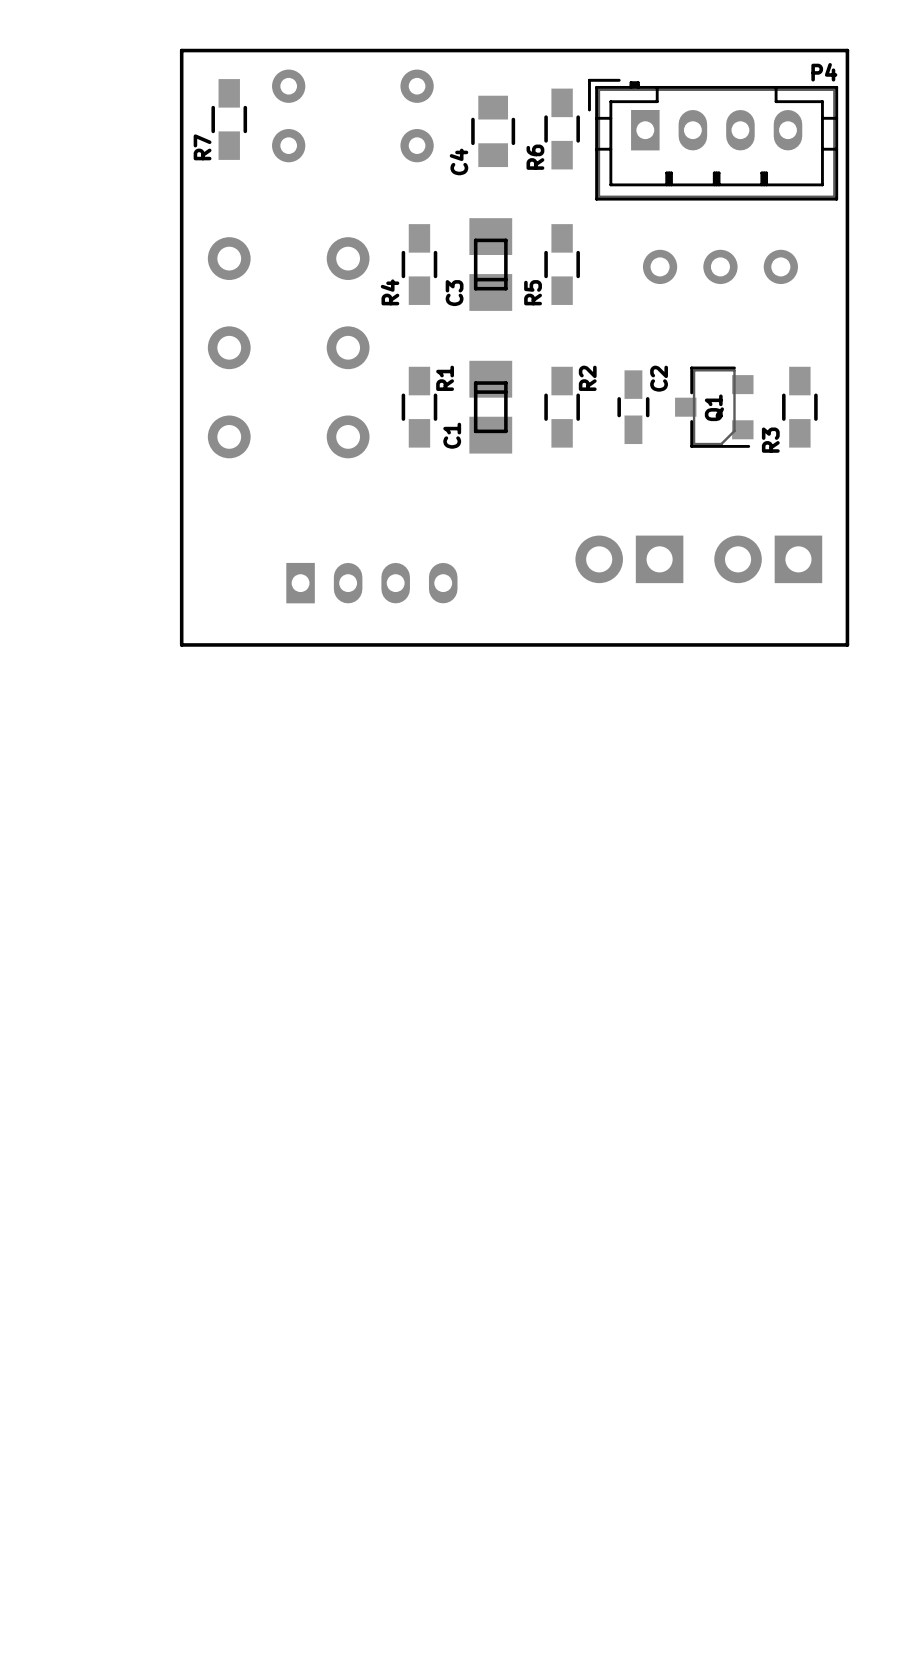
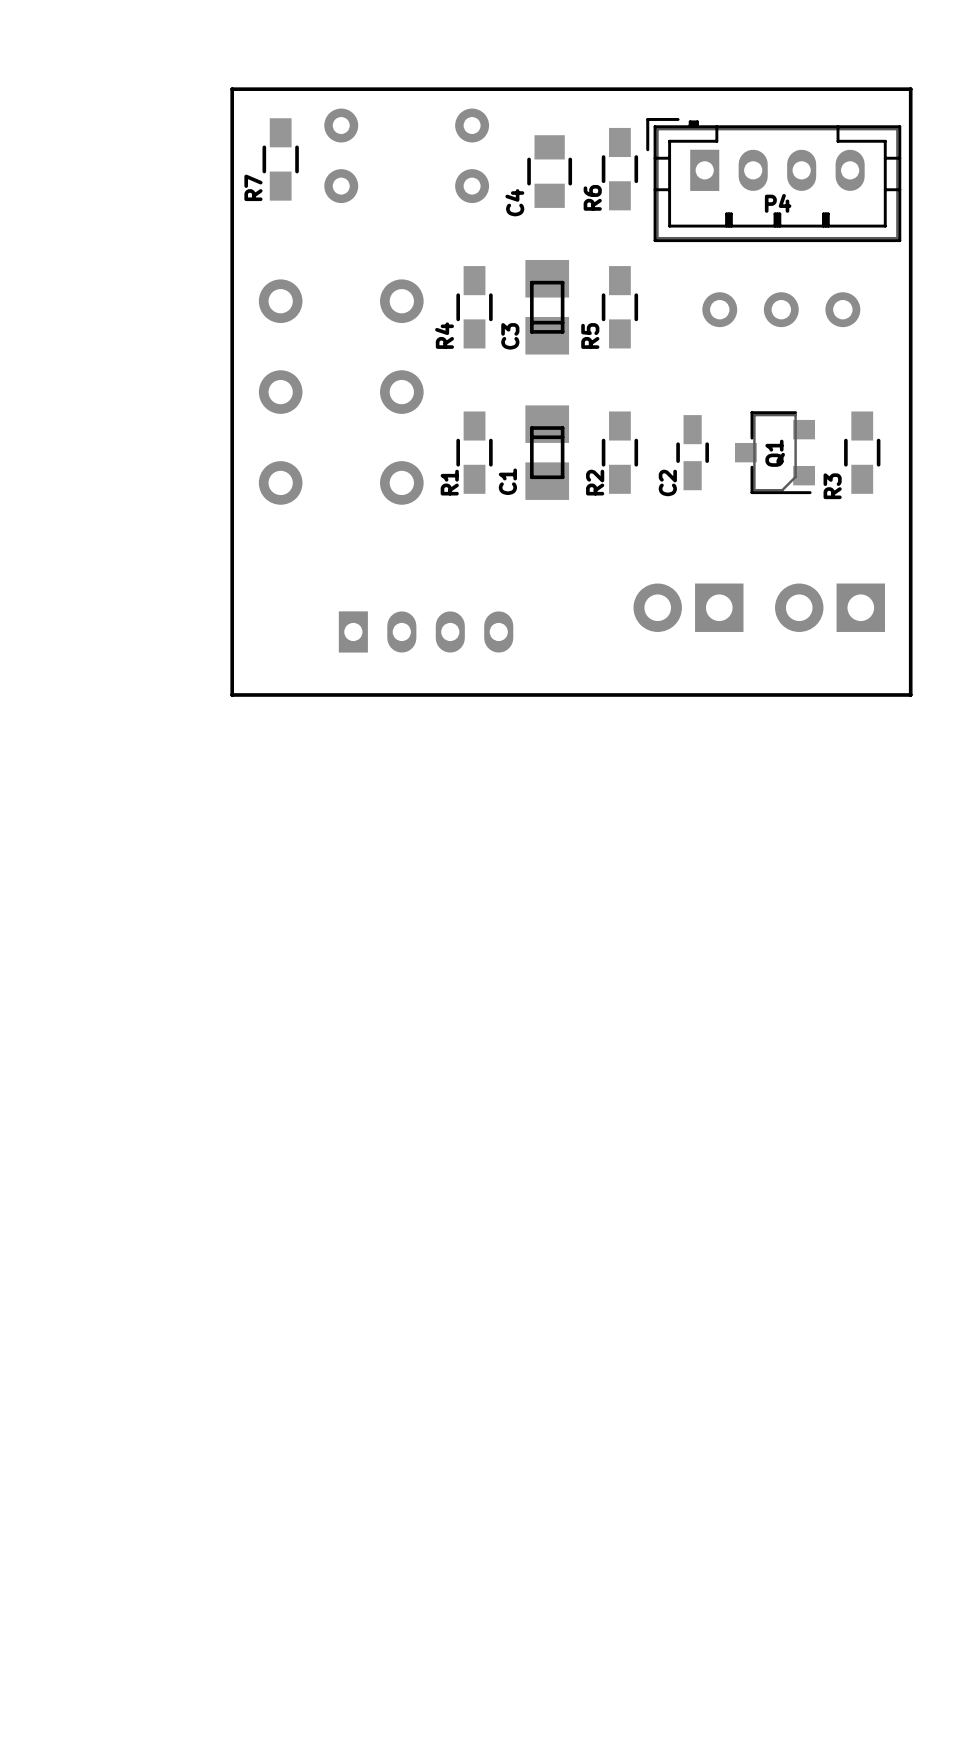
P4 name position: P4 (824, 72) -> P4 (778, 203)
R1 name position: R1 (445, 378) -> R1 (449, 482)
R2 name position: R2 (587, 378) -> R2 (595, 482)
C2 name position: C2 (659, 378) -> C2 (667, 482)

